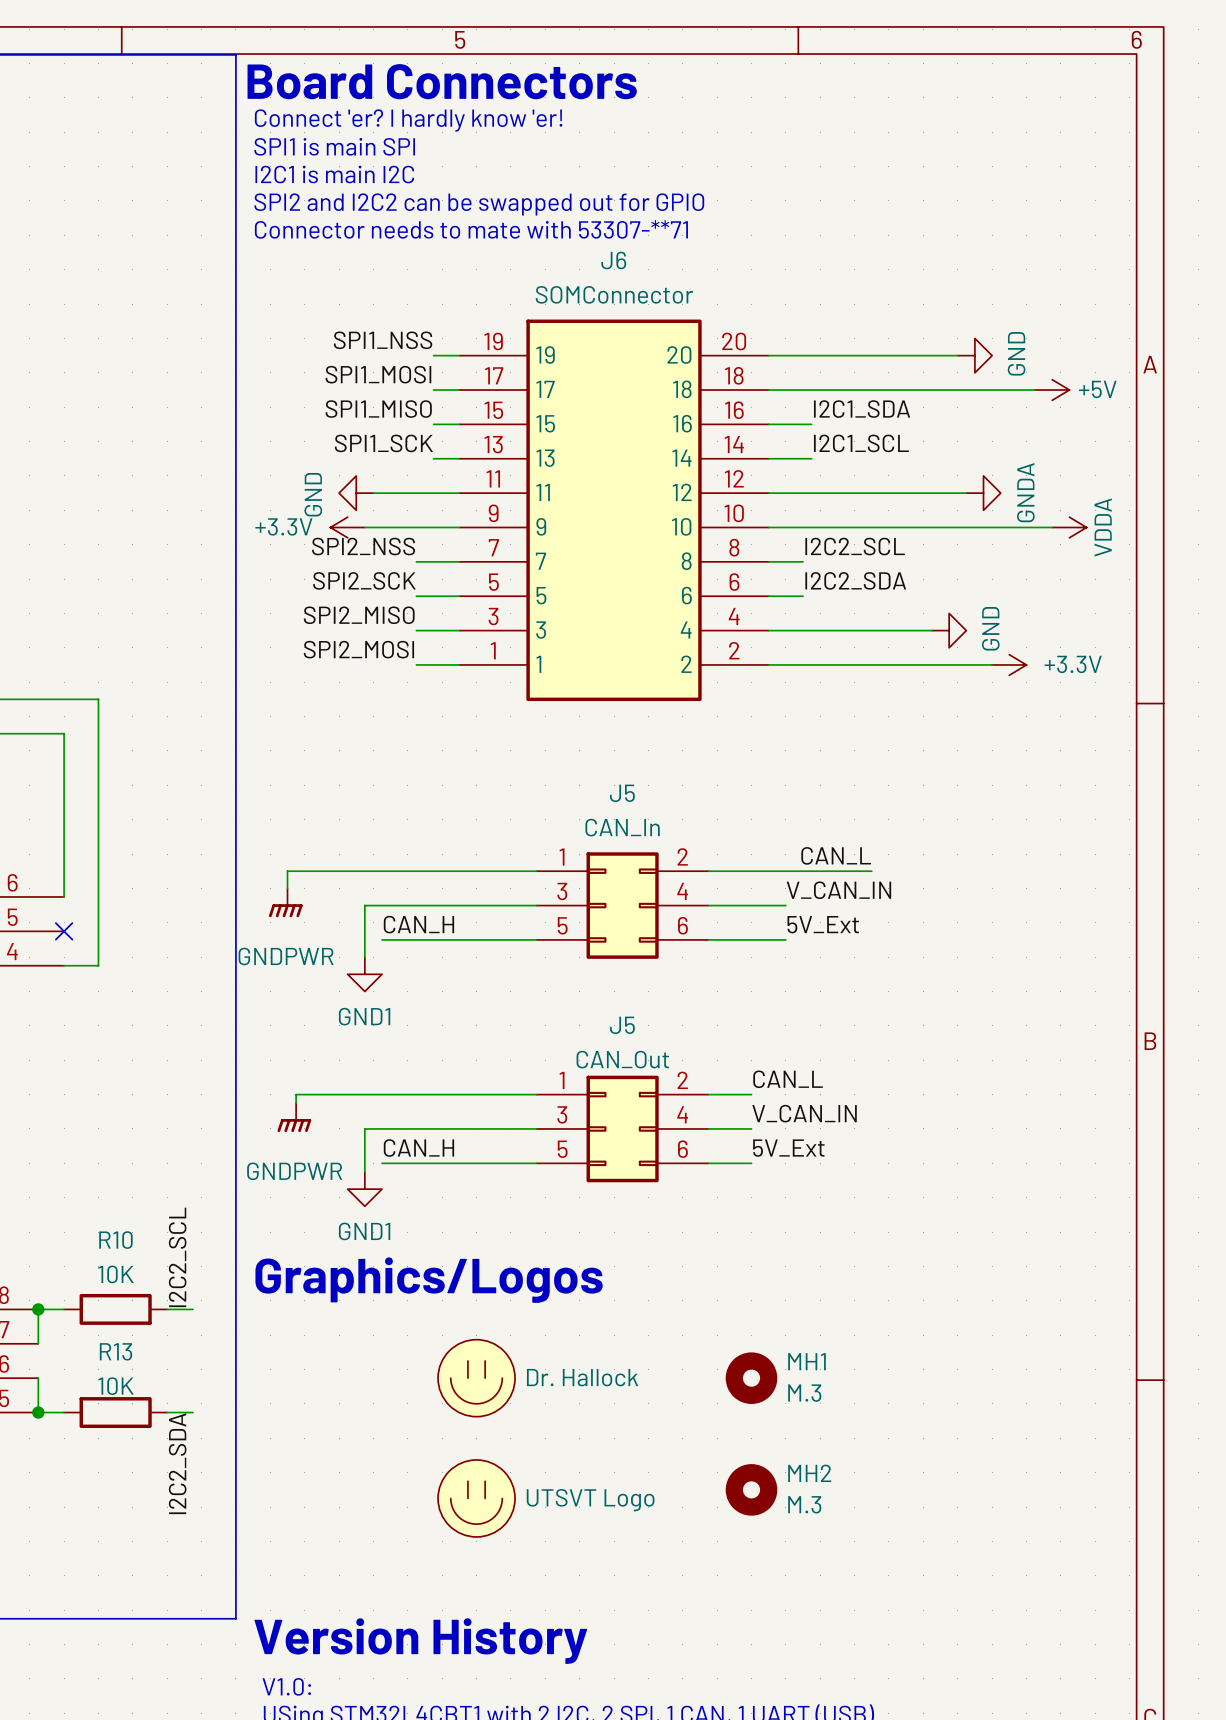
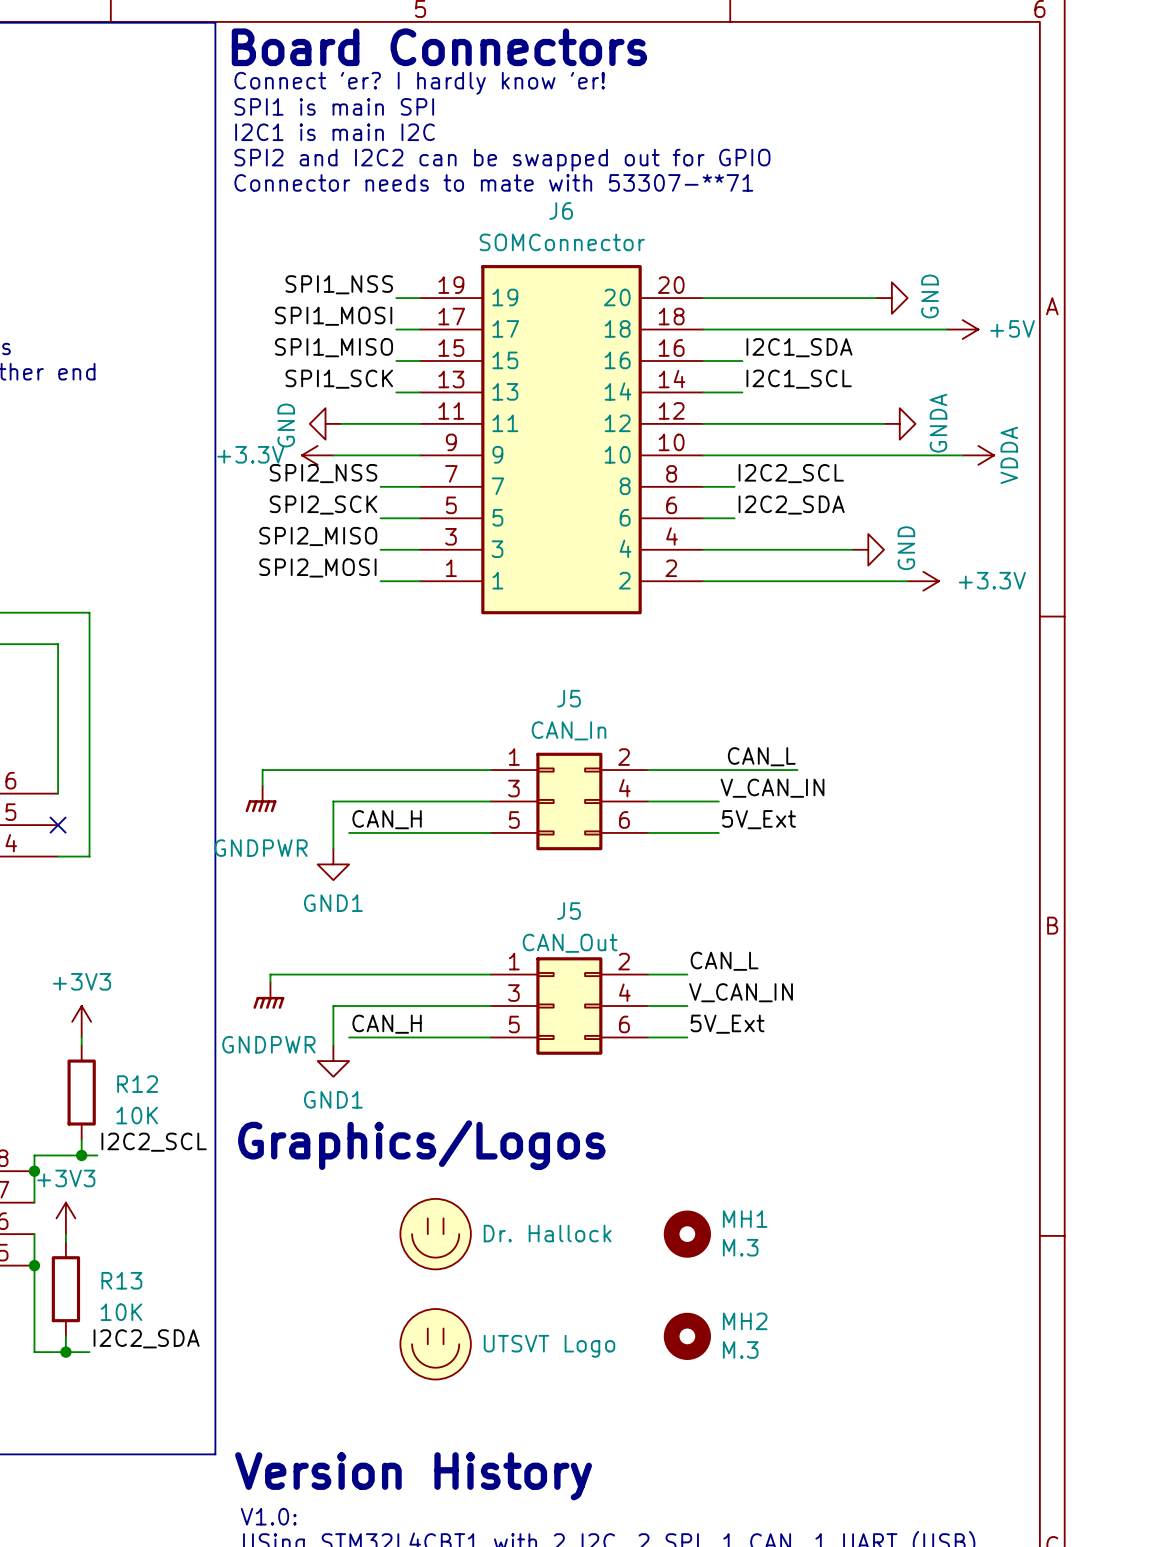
power symbol: none -> +3V3 (81, 1021)
wire: none -> (81, 1037) (81, 1045)
R12: none -> 10K (81, 1092)
label rotation: 0° (177, 1257) -> 90° clockwise (154, 1142)
wire: none -> (81, 1139) (81, 1155)
junction: none -> (81, 1155)
wire: (38, 1309) (64, 1309) -> (34, 1171) (34, 1155) (97, 1155)
R10: 10K (115, 1309) -> none
wire: (167, 1309) (192, 1309) -> none
power symbol: none -> +3V3 (65, 1218)
wire: none -> (65, 1234) (65, 1242)
R13 value position: 10K (116, 1386) -> 10K (121, 1312)
wire: (38, 1412) (64, 1412) -> (34, 1265) (34, 1352) (89, 1352)
R13 rotation: 0° (115, 1412) -> 90° clockwise (65, 1289)
wire: (167, 1412) (192, 1412) -> none
label rotation: 0° (177, 1463) -> 90° clockwise (146, 1338)
wire: none -> (65, 1336) (65, 1352)
junction: none -> (65, 1352)

